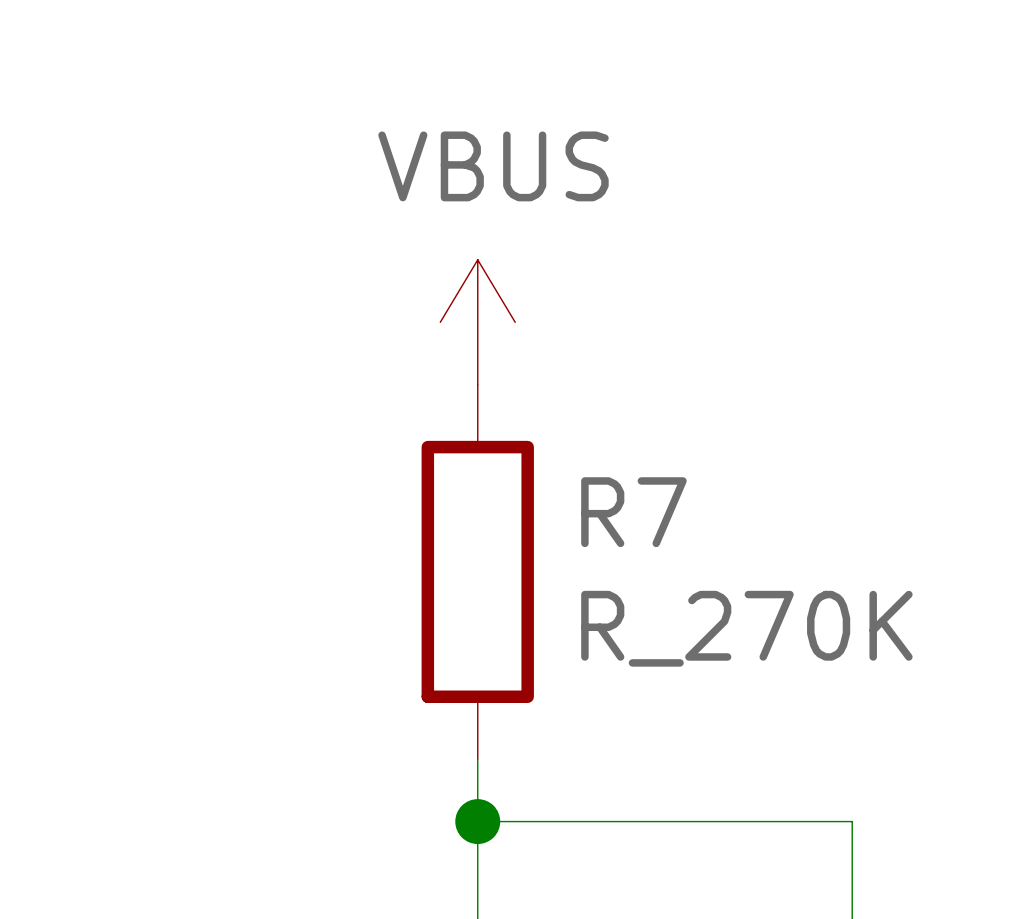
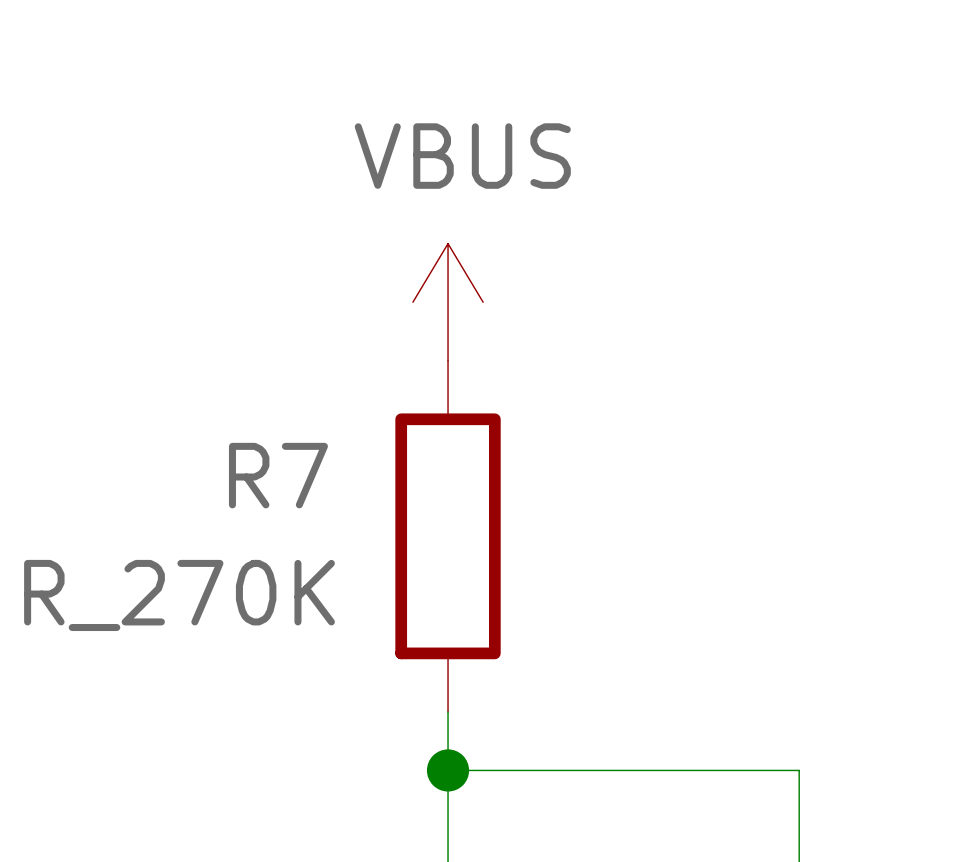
R7 name position: R7 (633, 512) -> R7 (278, 475)
R7 value position: R_270K (746, 628) -> R_270K (179, 595)

